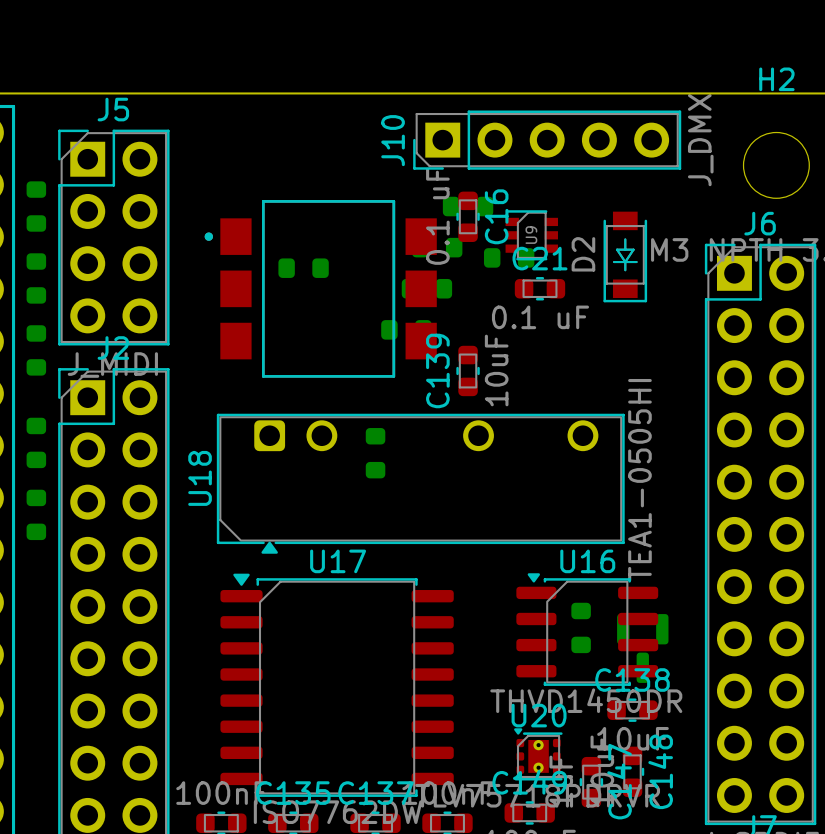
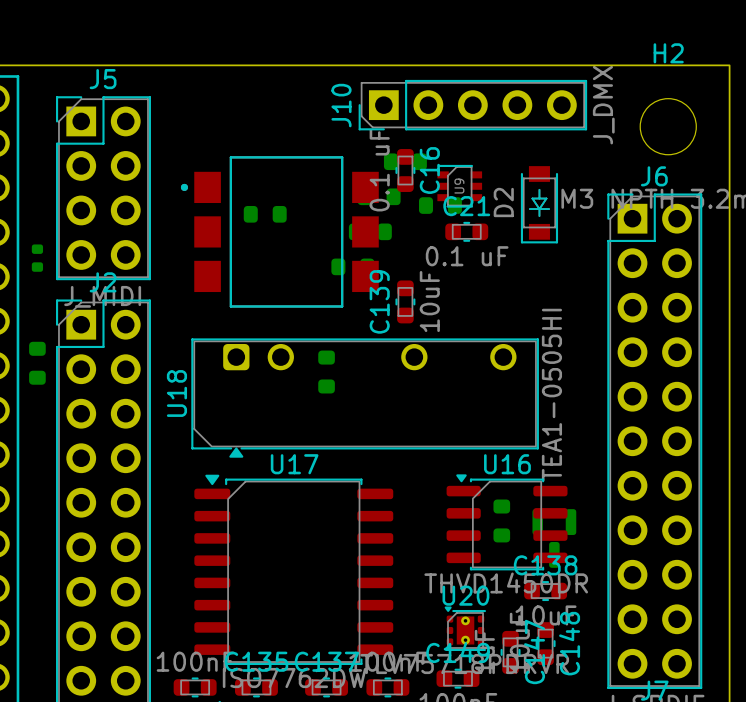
part: (36, 206) -> none
part: (36, 278) -> none
part: none -> (37, 258)
part: (36, 350) -> none
part: (36, 514) -> none

